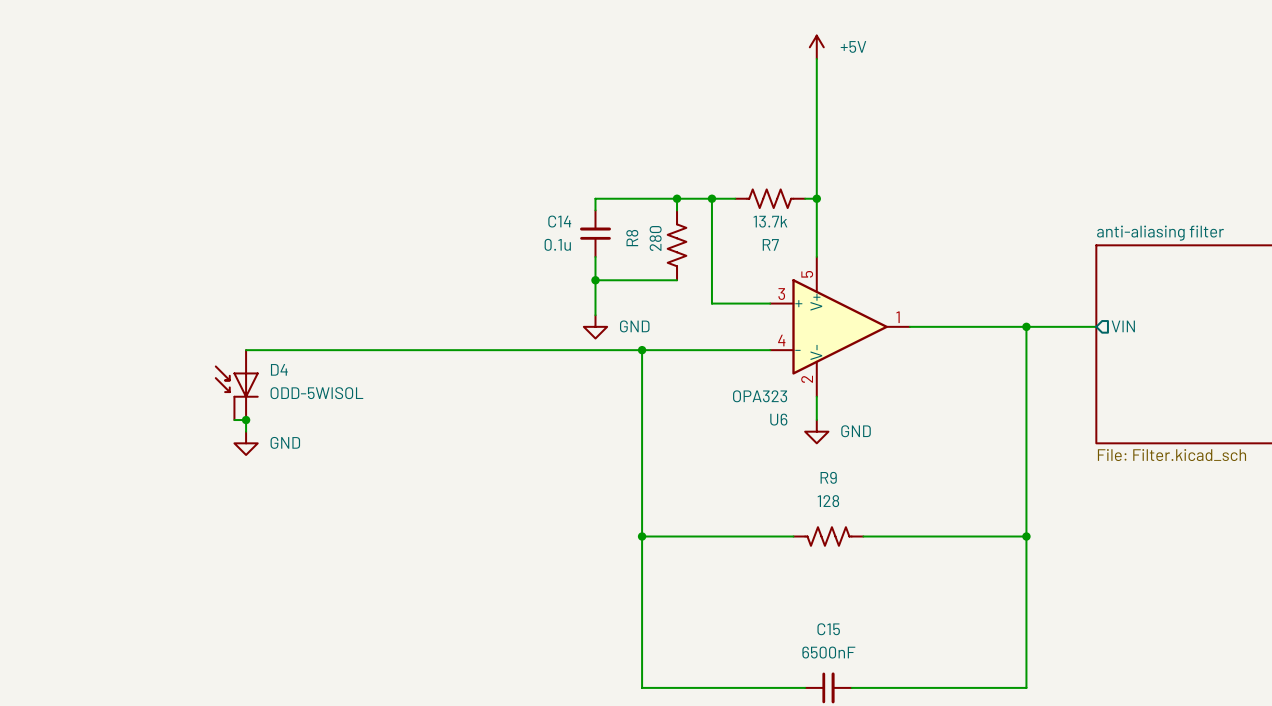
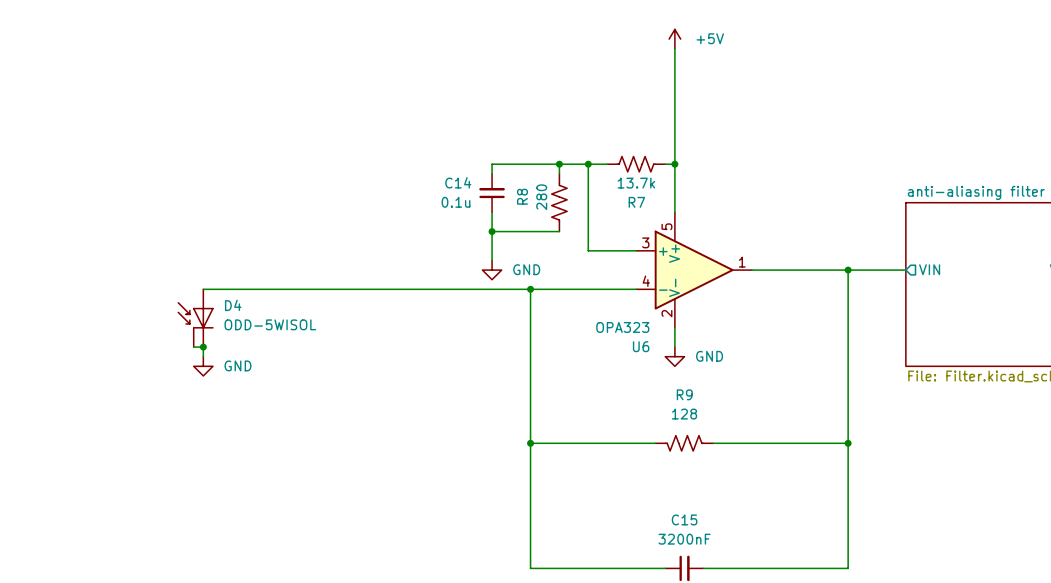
C15 value: 6500nF (828, 652) -> 3200nF (684, 539)

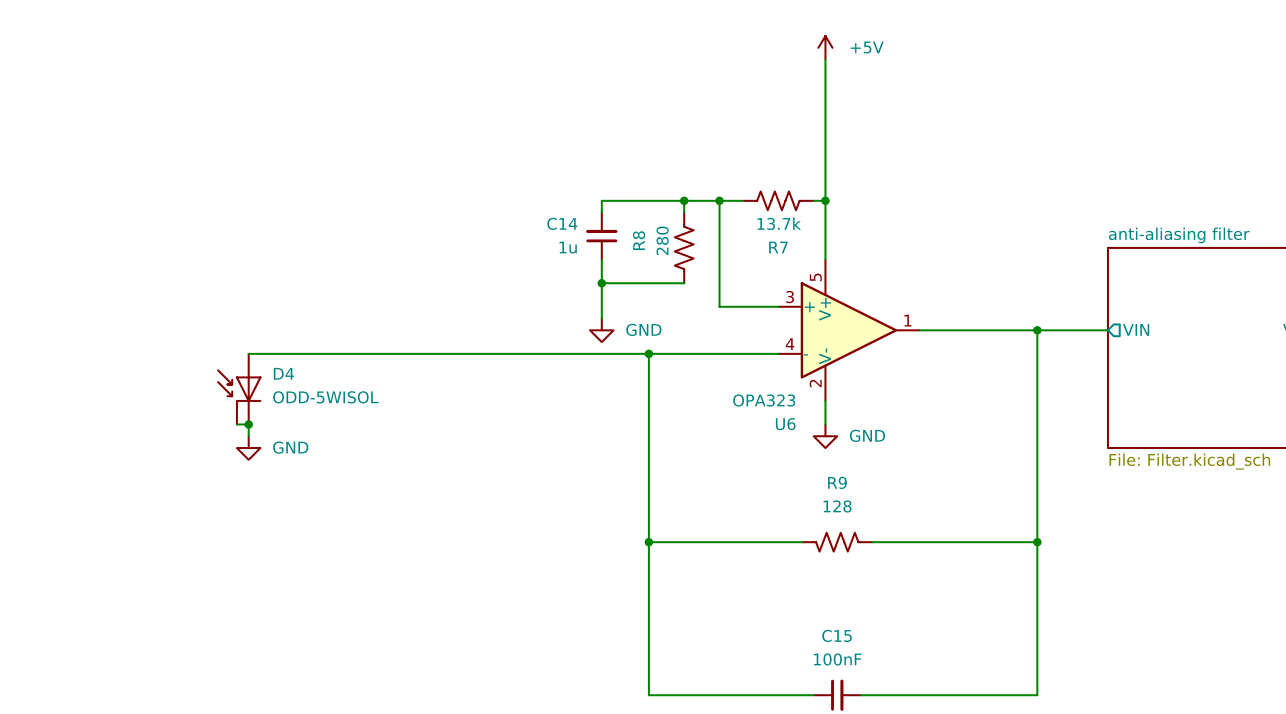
C14 value: 0.1u (456, 202) -> 1u (568, 247)
C15 value: 3200nF (684, 539) -> 100nF (837, 659)

